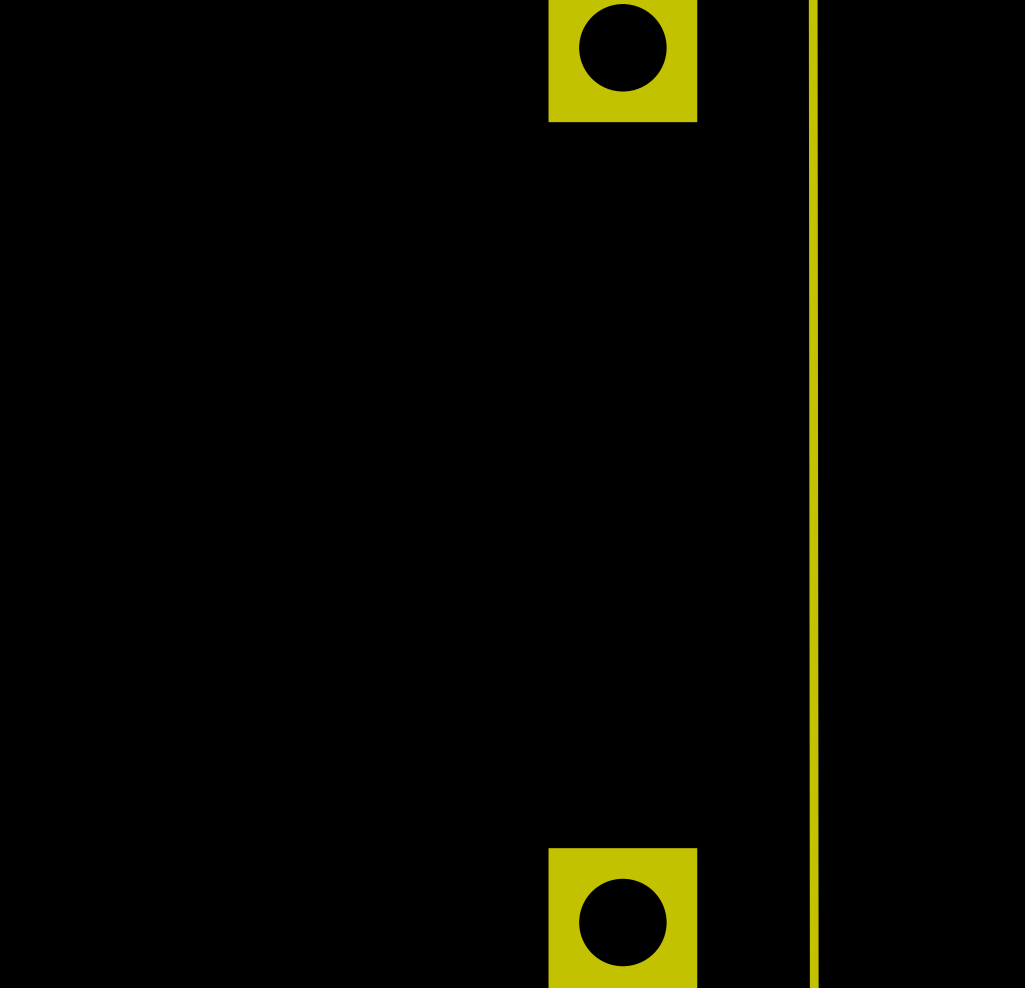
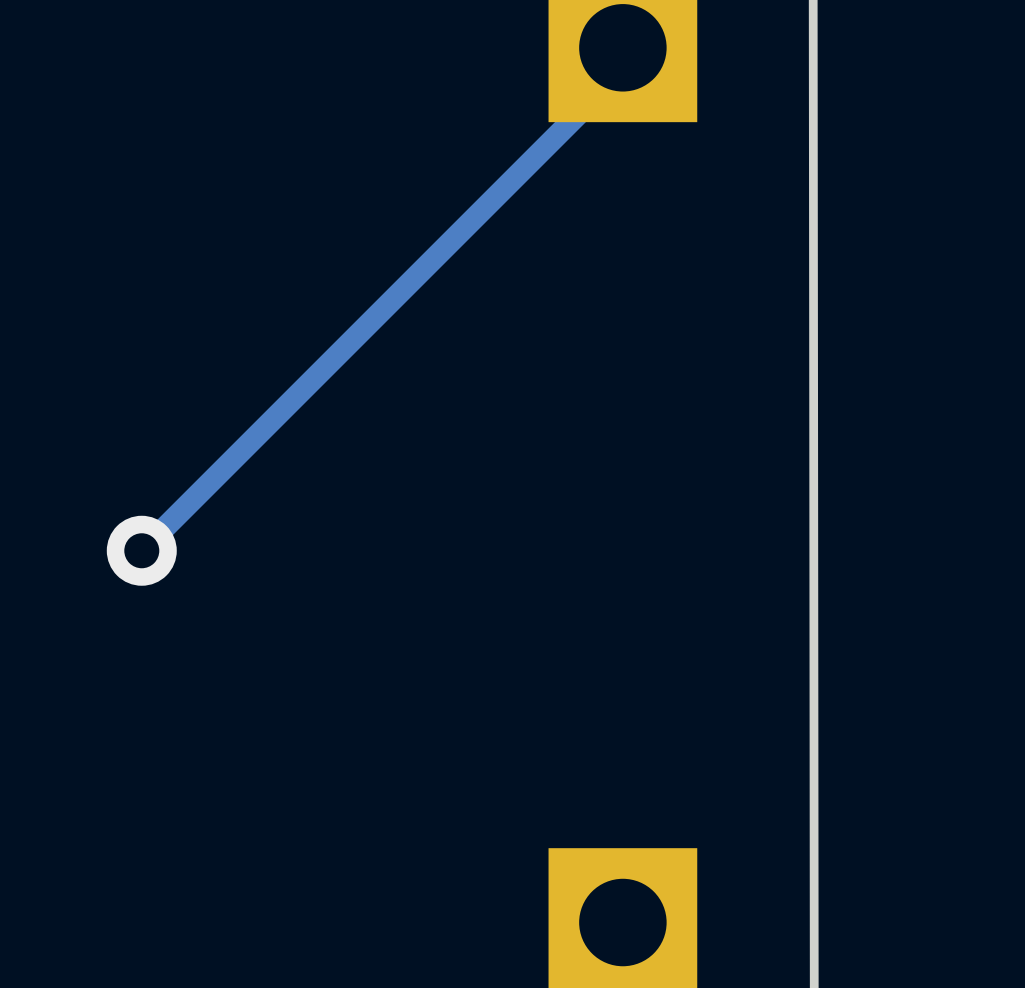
track: none -> (622, 47) (622, 69) (141, 550)
via: none -> (141, 550)

